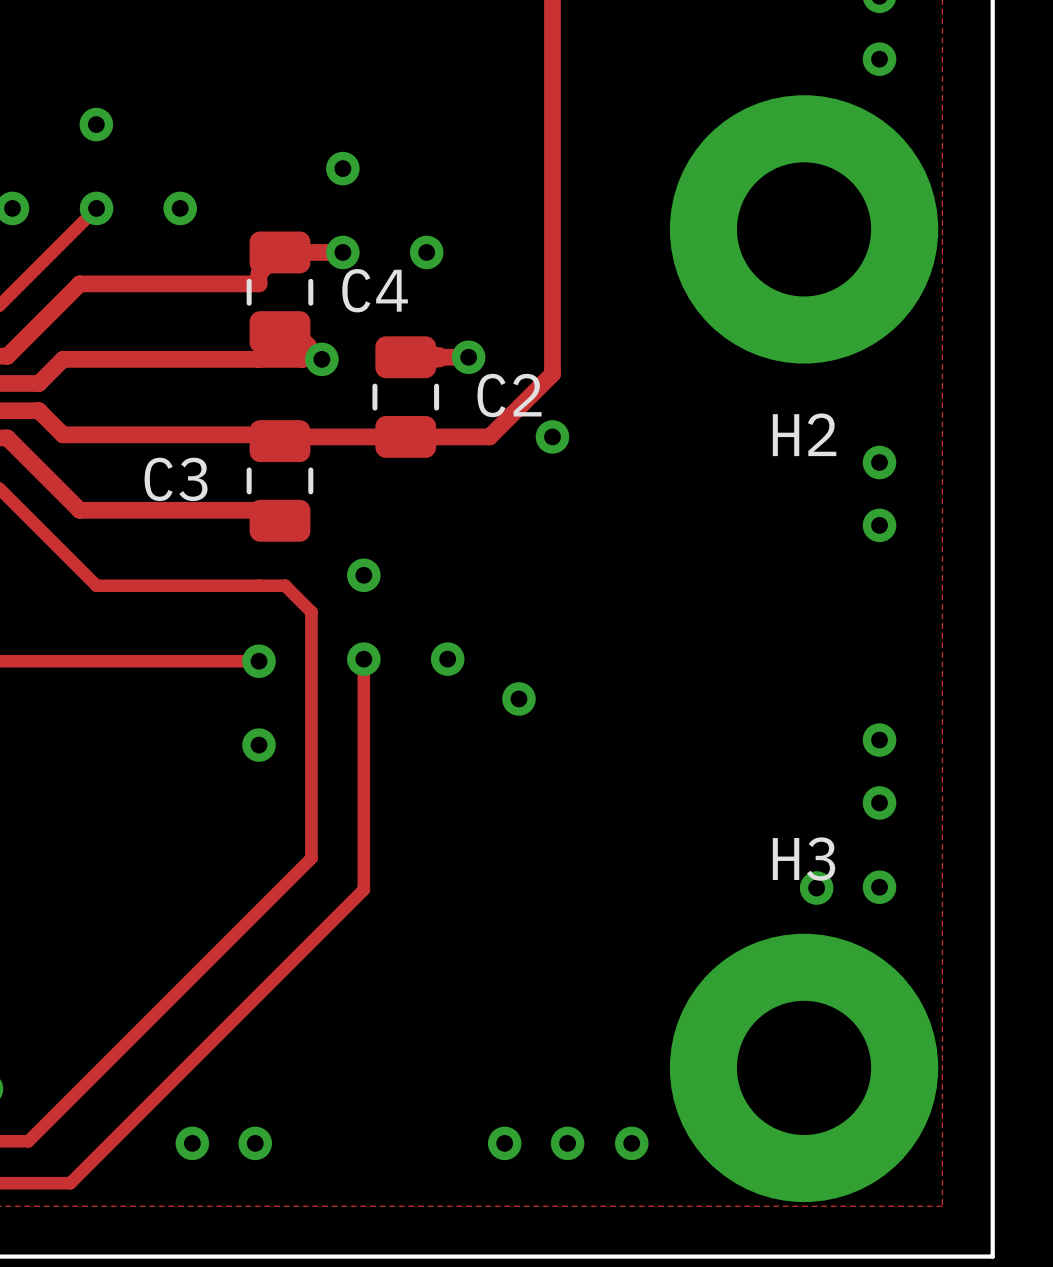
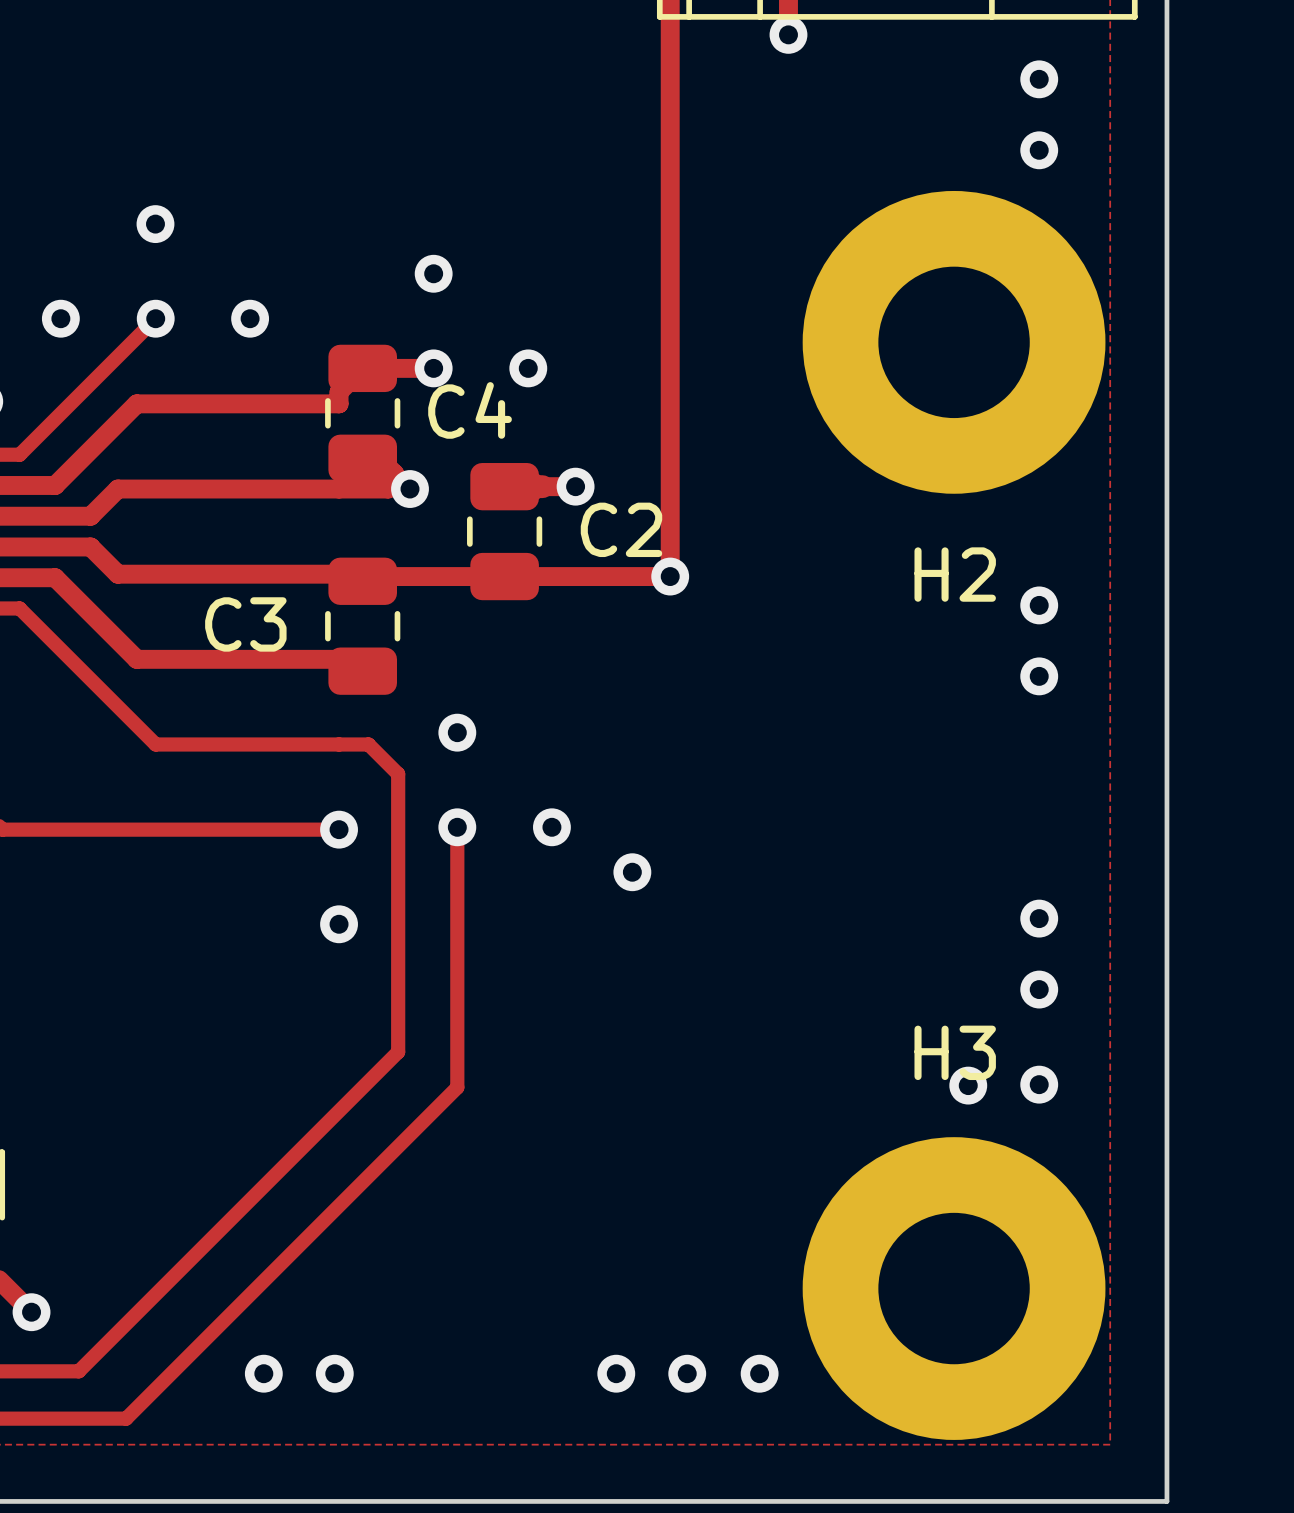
track: (552, 374) (489, 436) -> (670, 505) (670, 576) (599, 576)

